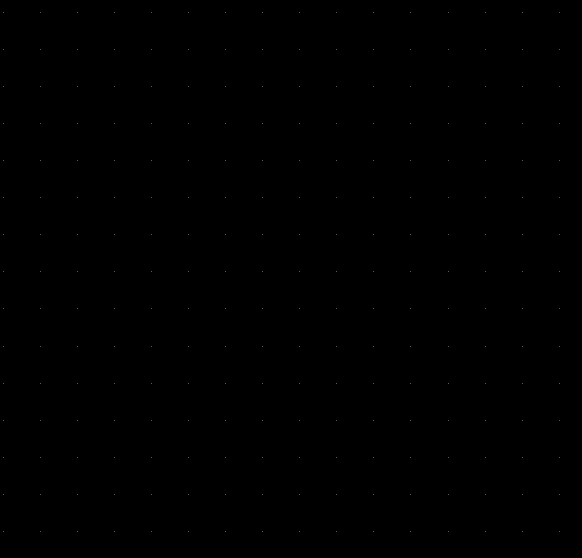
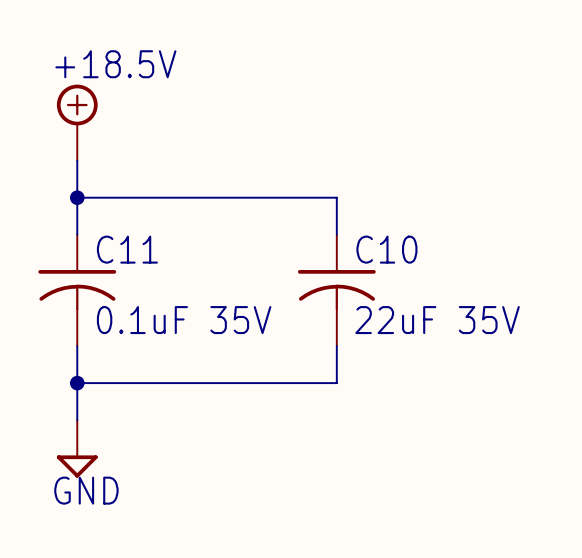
power symbol: none -> +18.5V (77, 122)
wire: none -> (77, 160) (77, 234)
wire: none -> (77, 197) (336, 197) (336, 234)
junction: none -> (77, 197)
C11: none -> 0.1uF 35V (77, 290)
C10: none -> 22uF 35V (336, 290)
wire: none -> (77, 346) (77, 420)
wire: none -> (336, 346) (336, 383) (77, 383)
junction: none -> (77, 383)
power symbol: none -> GND (77, 448)

